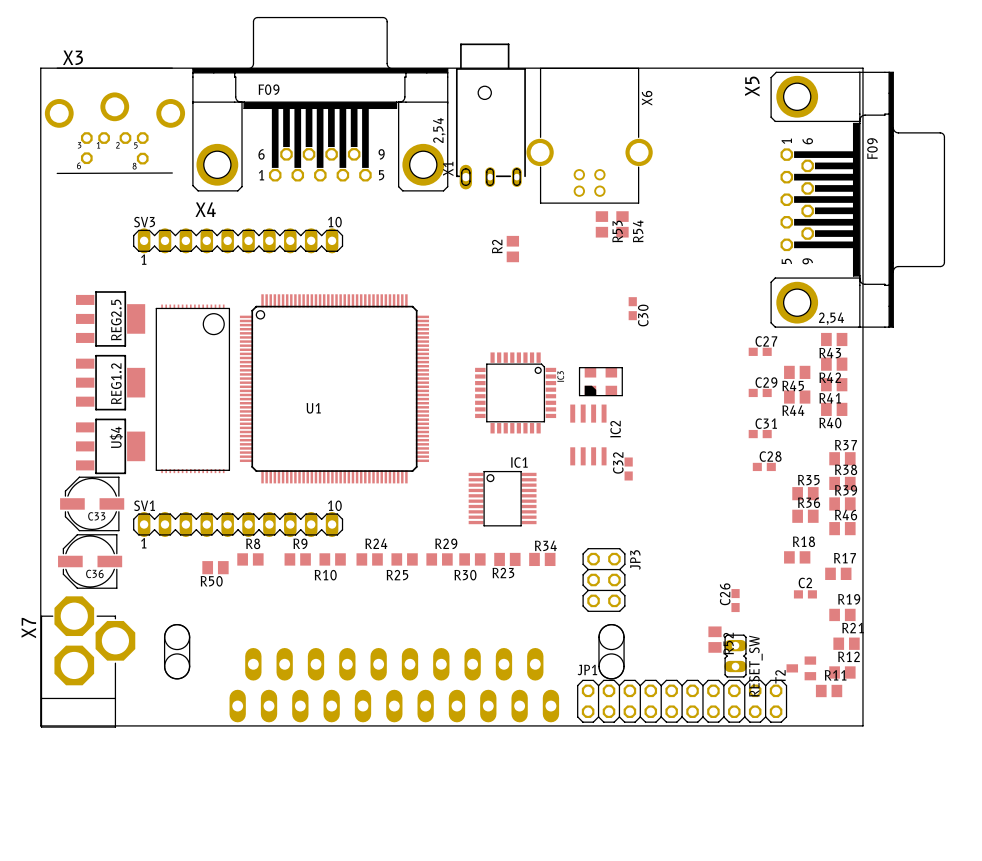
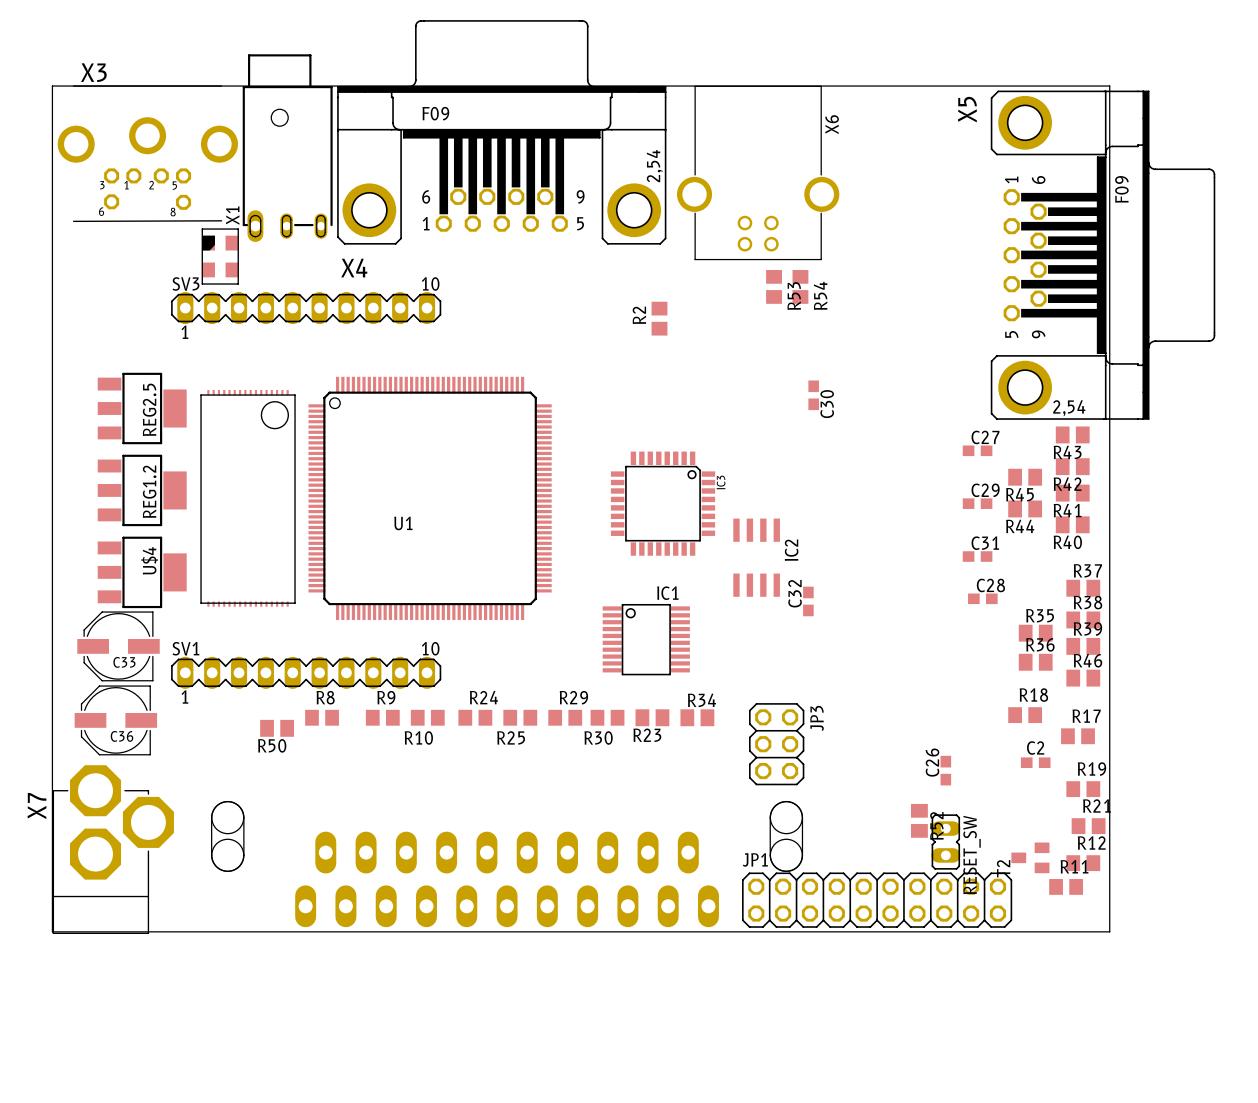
X4 position: (320, 104) -> (501, 132)
X1 position: (490, 116) -> (287, 148)
part: none -> (220, 256)
part: (600, 381) -> none

